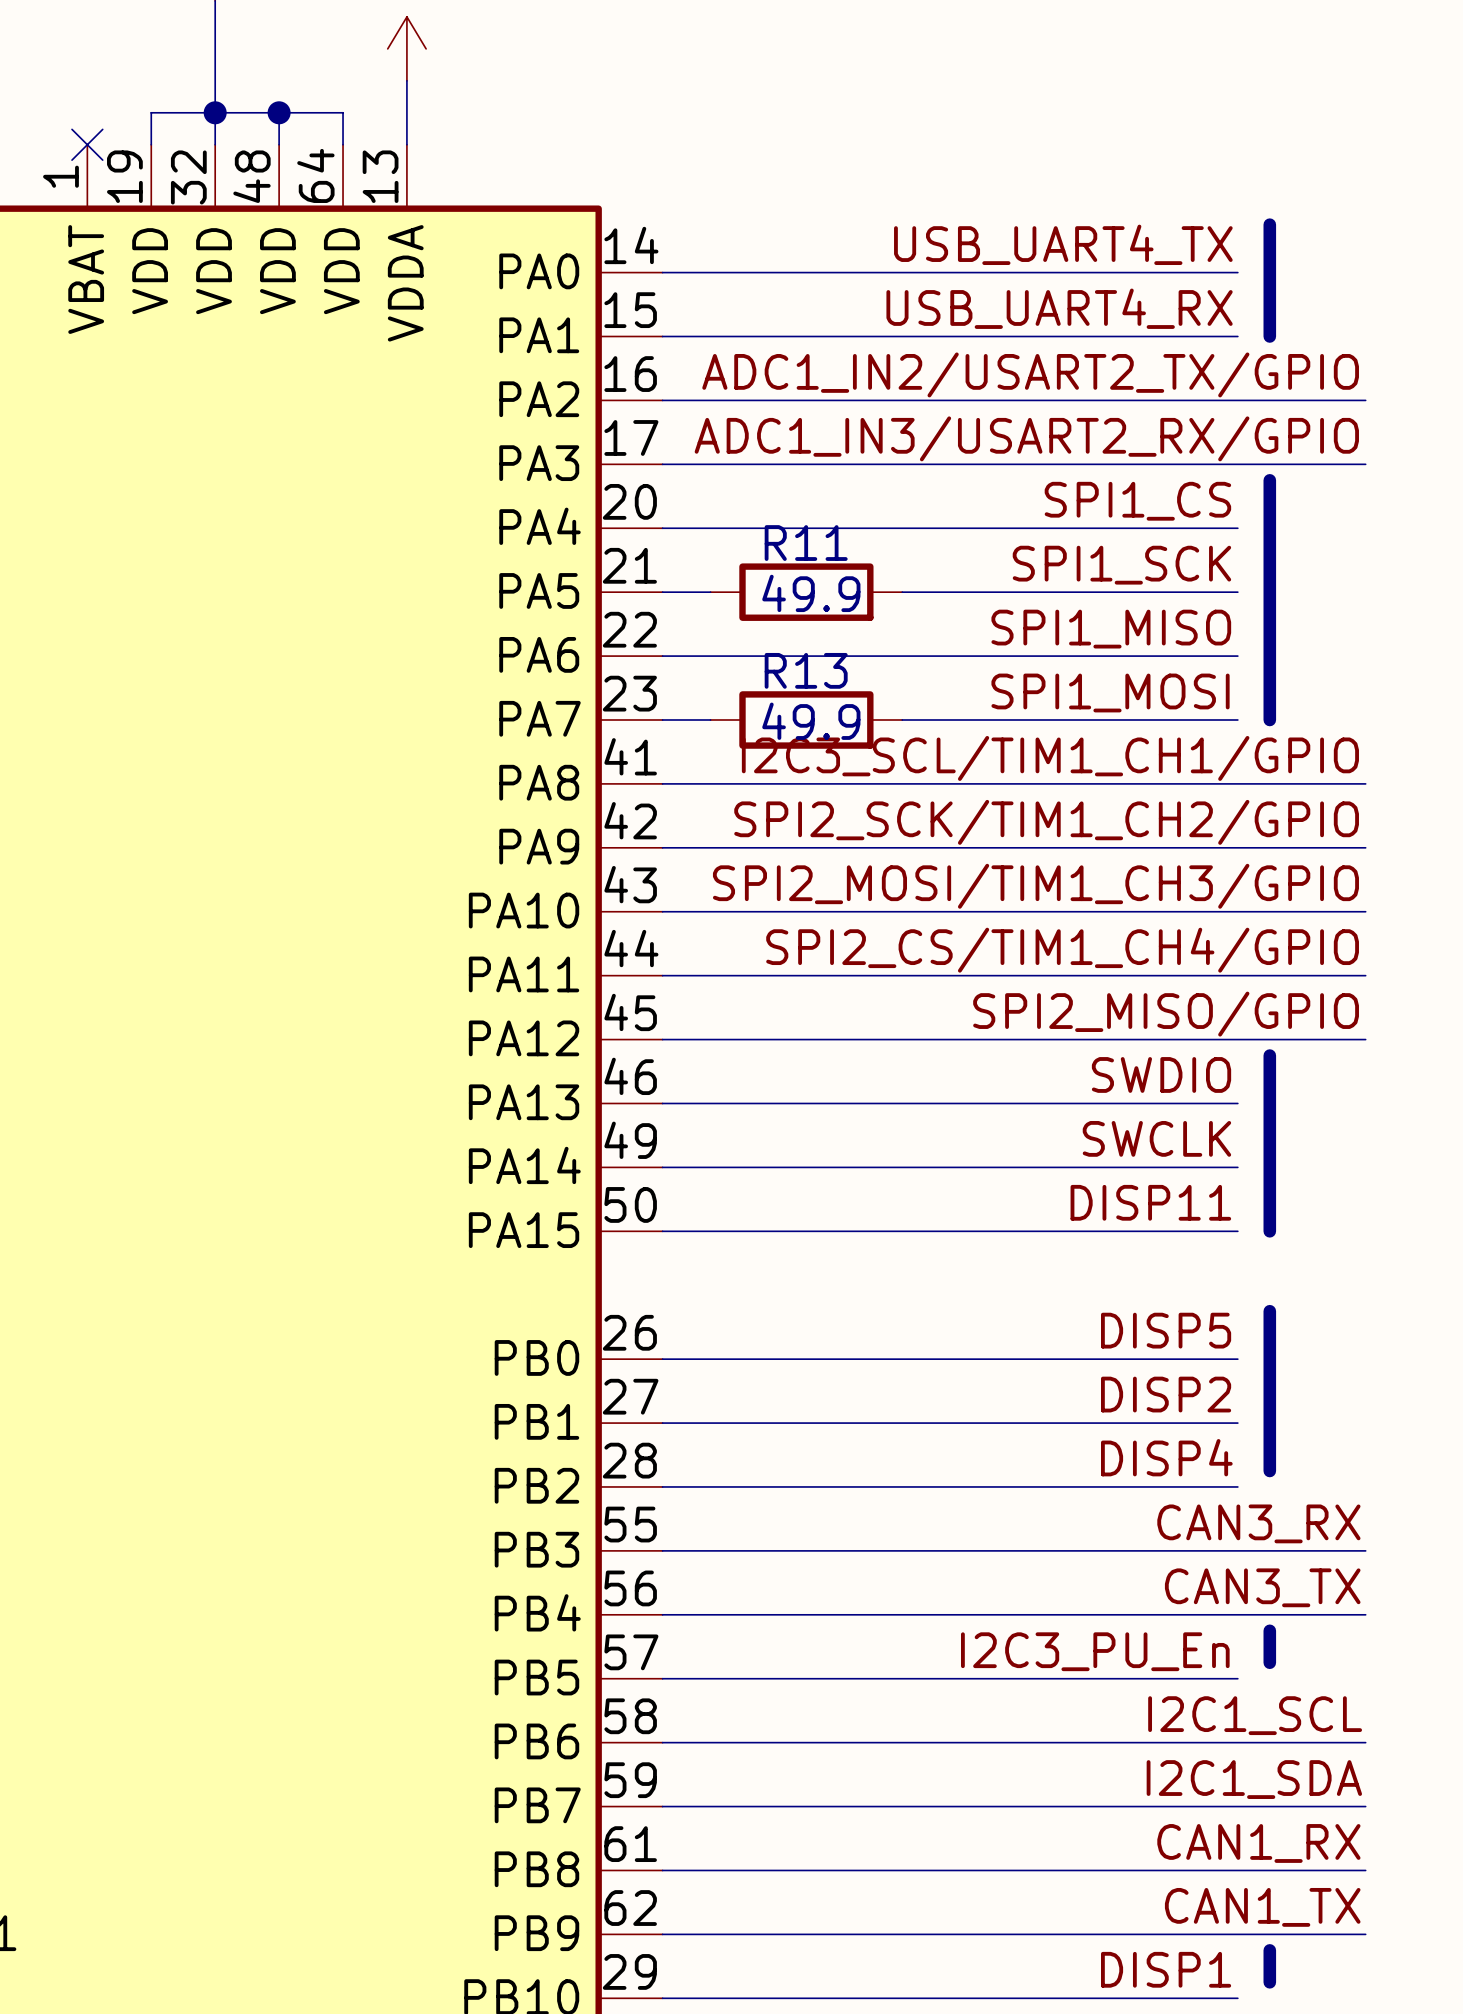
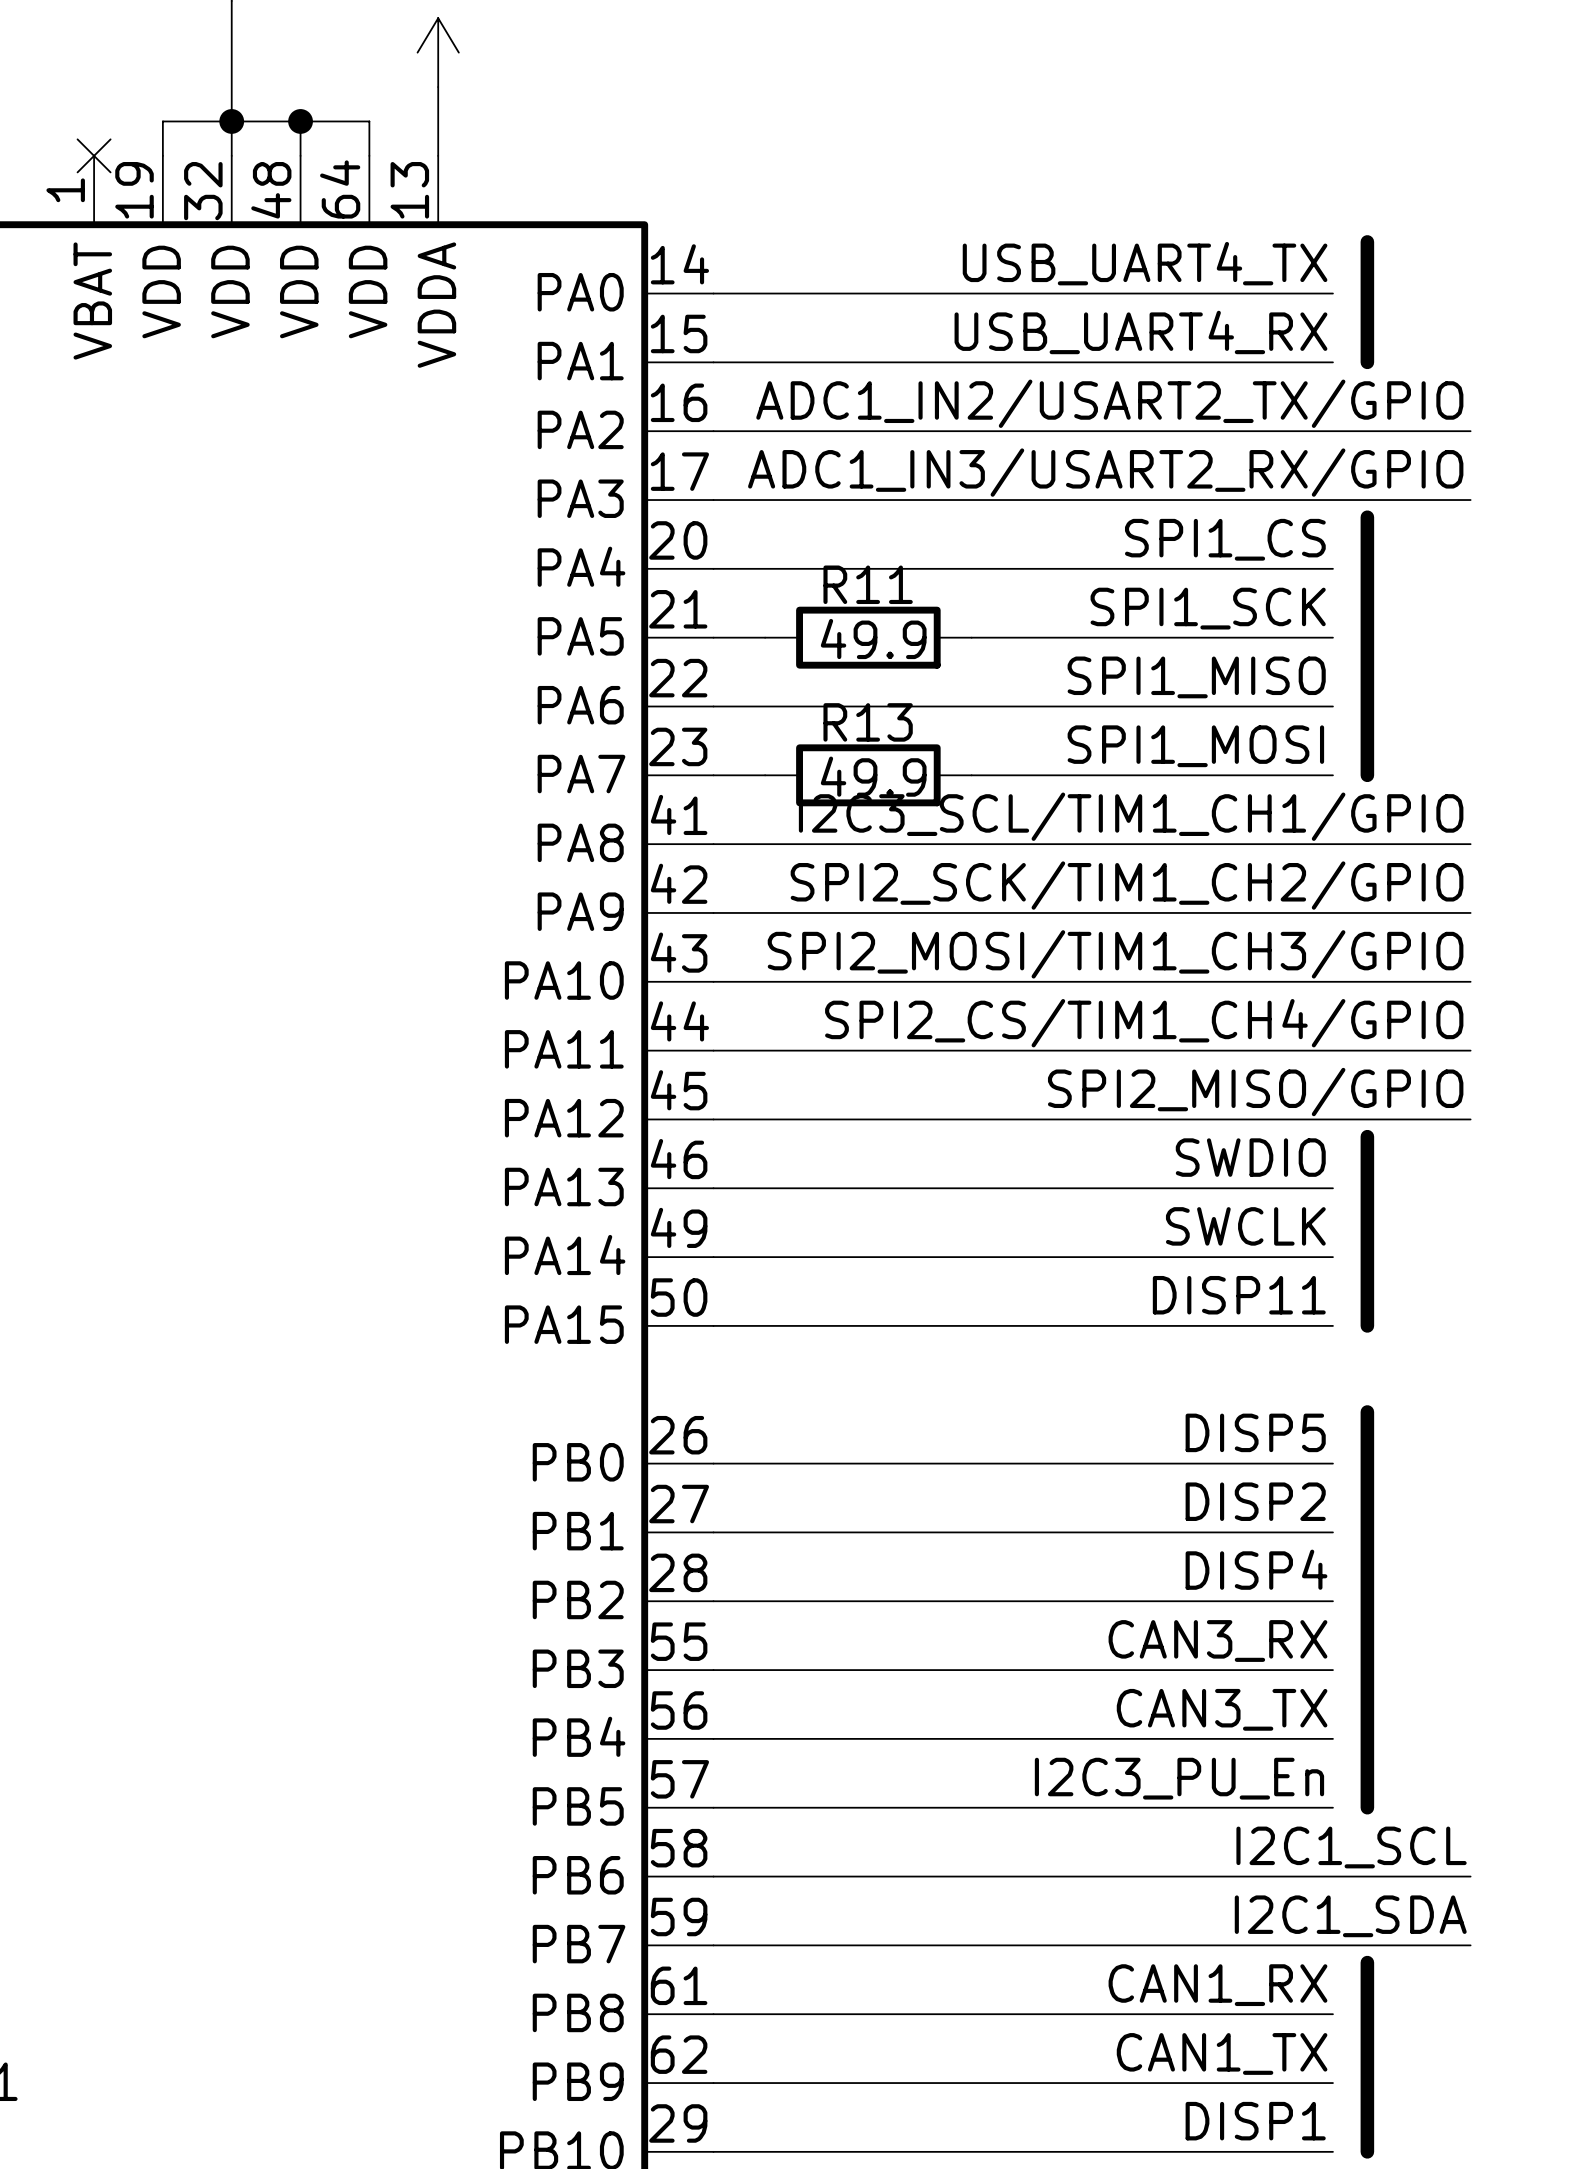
line: none -> (1367, 1584) (1367, 1756)
label position: CAN3_RX (1258, 1523) -> CAN3_RX (1217, 1641)
wire: (1237, 1550) (1365, 1550) -> none
label position: CAN3_TX (1262, 1587) -> CAN3_TX (1222, 1709)
wire: (1237, 1614) (1365, 1614) -> none
line: none -> (1367, 1790) (1367, 1807)
line: none -> (1367, 1962) (1367, 2100)
label position: CAN1_RX (1258, 1843) -> CAN1_RX (1217, 1985)
wire: (1237, 1870) (1365, 1870) -> none
label position: CAN1_TX (1262, 1907) -> CAN1_TX (1222, 2053)
wire: (1237, 1934) (1365, 1934) -> none
line: none -> (1367, 2134) (1367, 2151)

